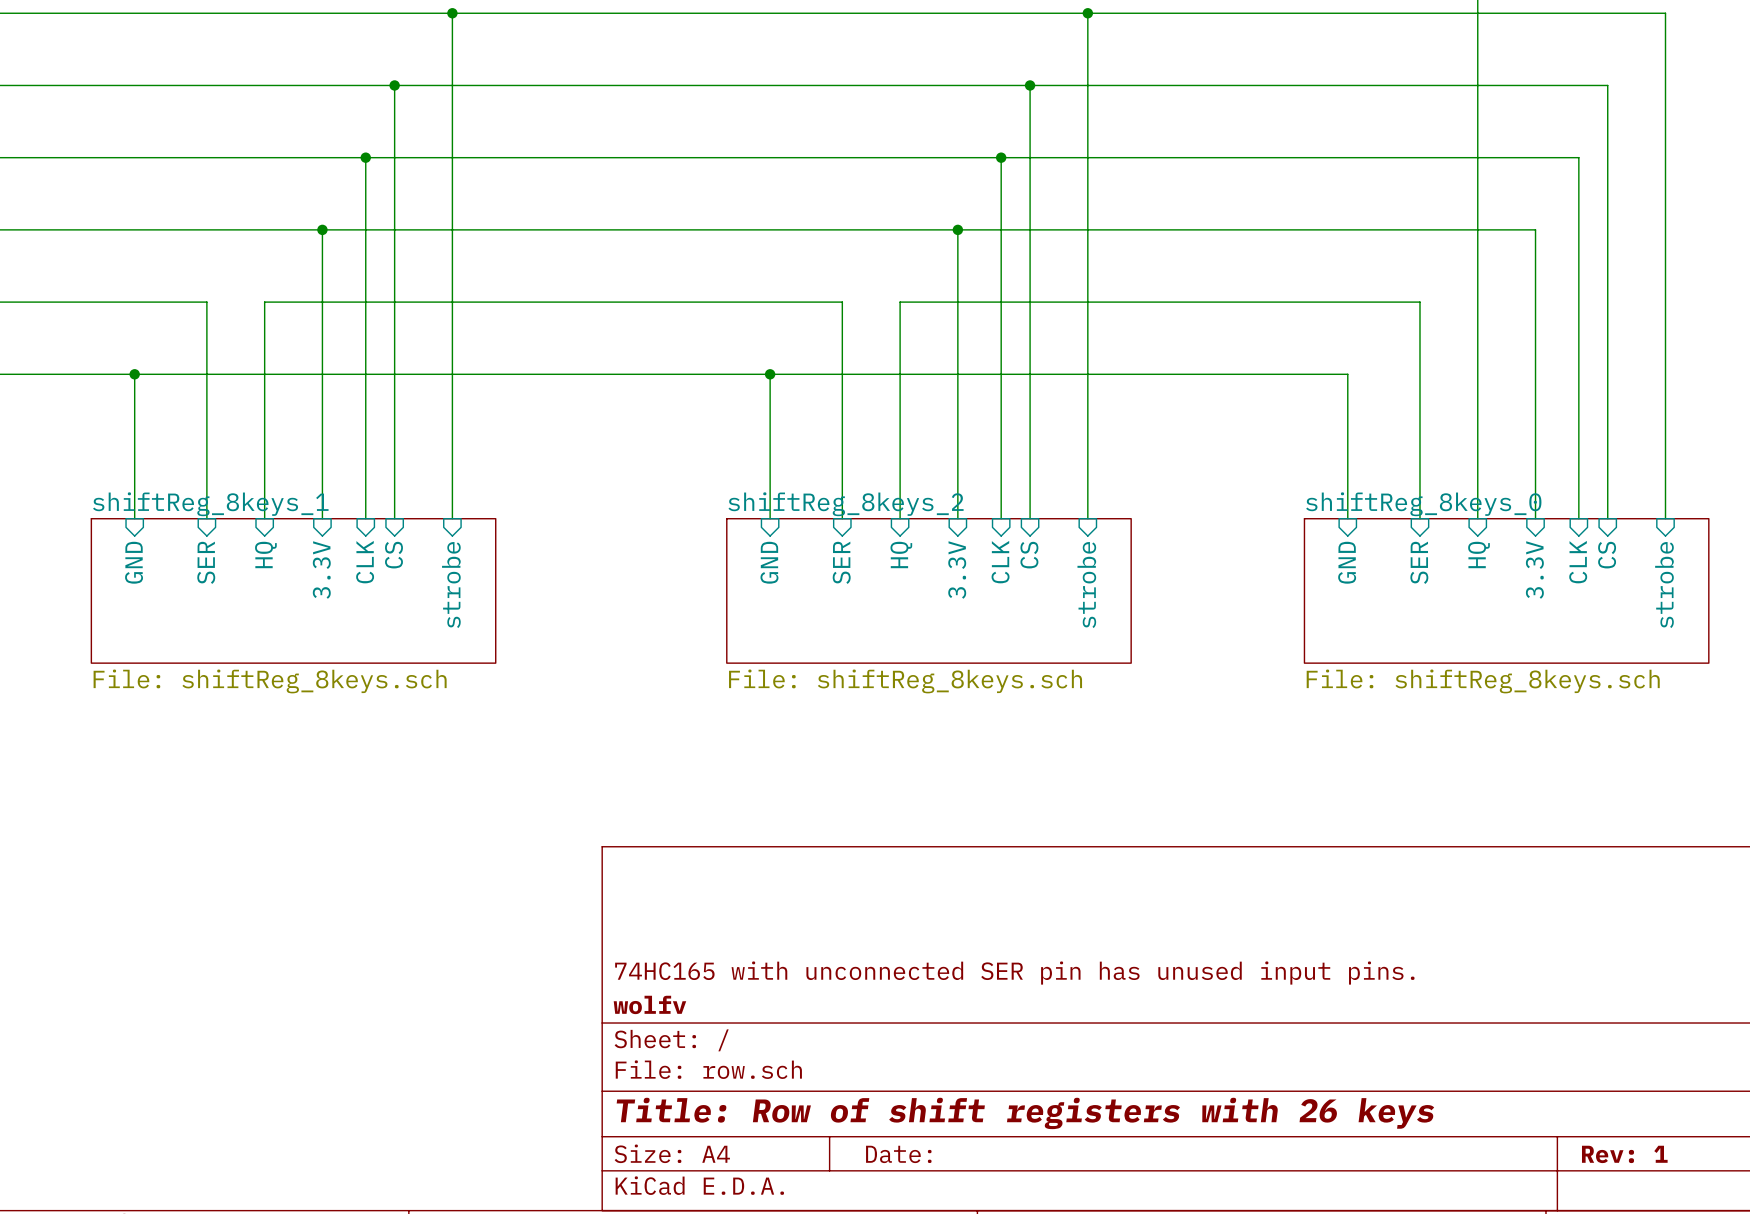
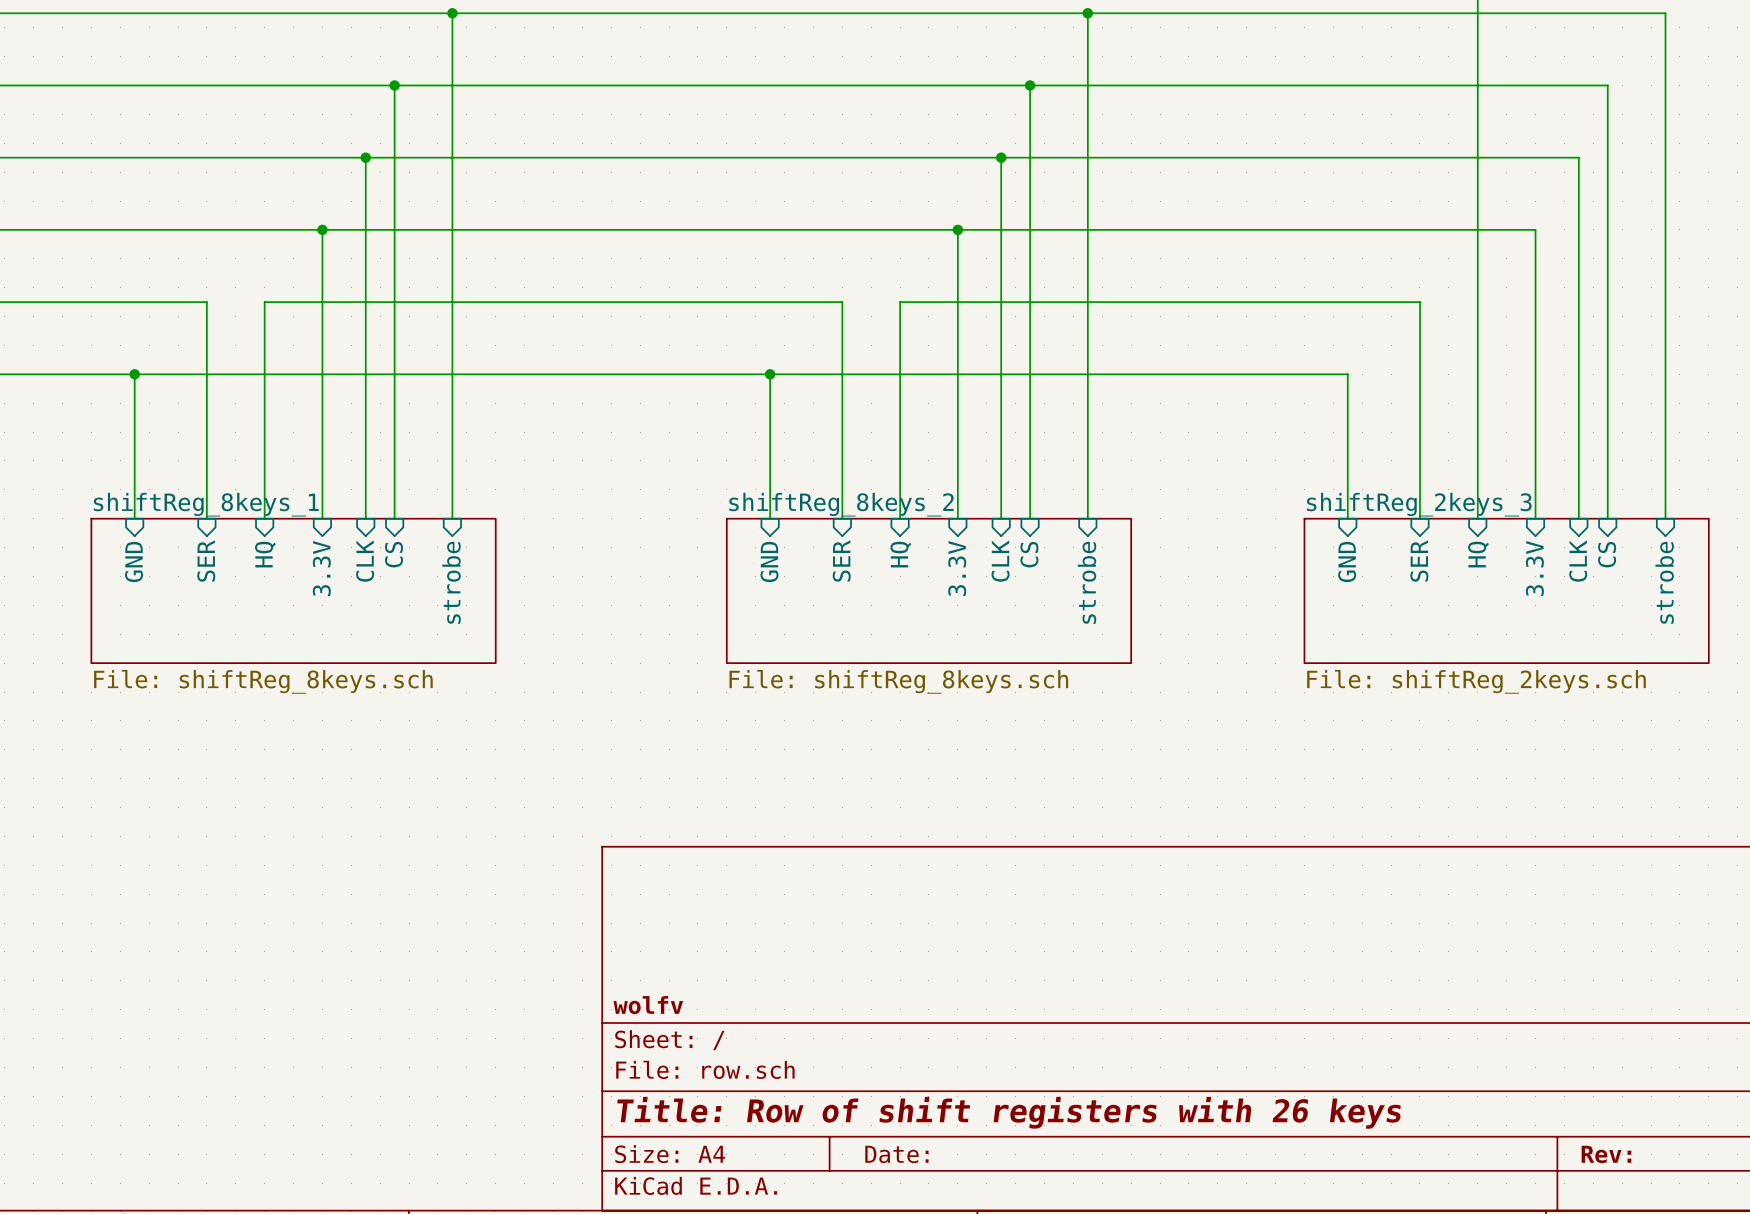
sheet shiftReg_8keys_0 name: shiftReg_8keys_0 (1423, 504) -> shiftReg_2keys_3 (1419, 504)
sheet shiftReg_8keys_0 value: File: shiftReg_8keys.sch (1483, 681) -> File: shiftReg_2keys.sch (1476, 681)
title block: 74HC165 with unconnected SER pin has unused input pins. (1014, 973) -> none
title block: Rev: 1 (1624, 1154) -> Rev: (1606, 1154)

